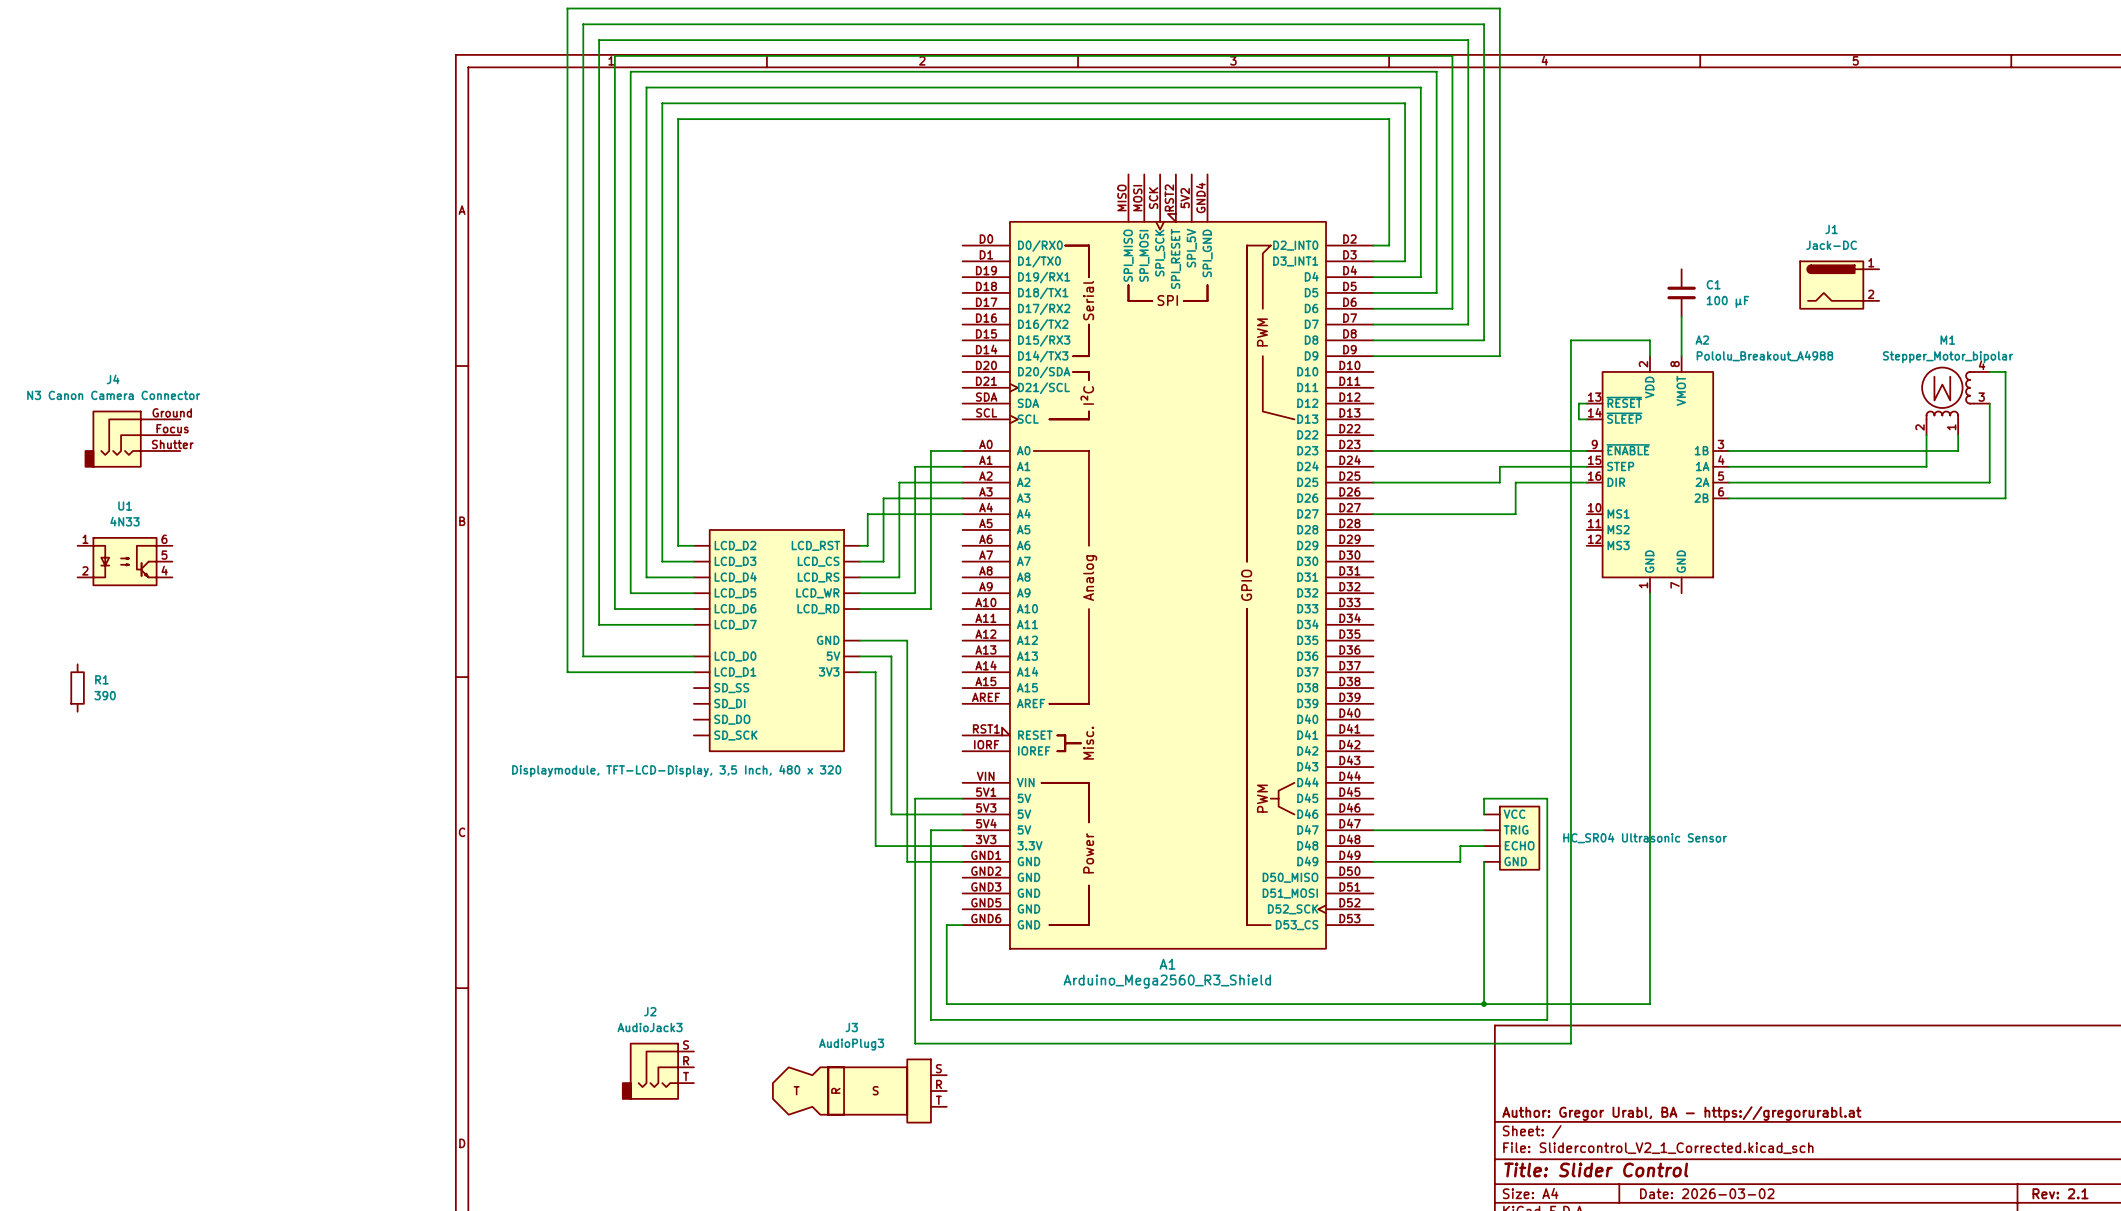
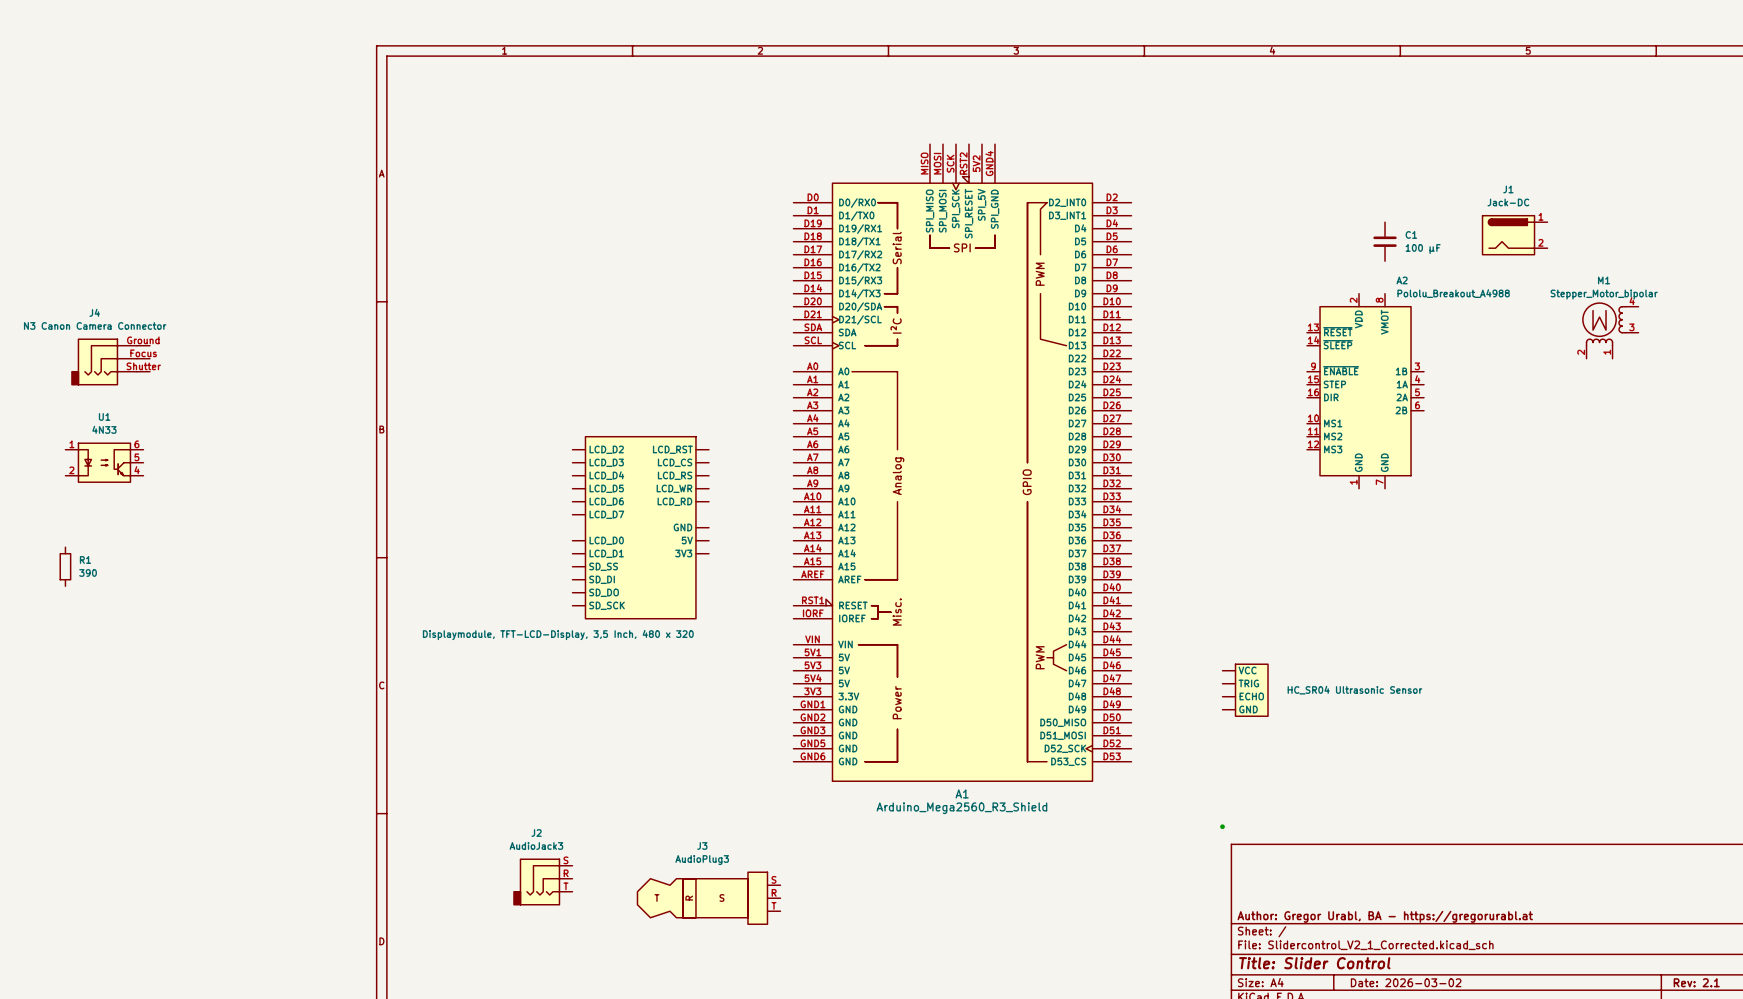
wire: (1373, 245) (1389, 245) (1389, 119) (678, 119) (678, 545) (693, 545) -> none
wire: (1373, 261) (1405, 261) (1405, 103) (662, 103) (662, 561) (693, 561) -> none
wire: (1373, 277) (1420, 277) (1420, 87) (646, 87) (646, 577) (693, 577) -> none
wire: (1373, 292) (1436, 292) (1436, 71) (630, 71) (630, 593) (693, 593) -> none
wire: (1373, 308) (1452, 308) (1452, 55) (614, 55) (614, 609) (693, 609) -> none
wire: (1681, 316) (1681, 356) -> none
wire: (1373, 324) (1468, 324) (1468, 40) (599, 40) (599, 624) (693, 624) -> none
wire: (1373, 340) (1484, 340) (1484, 24) (583, 24) (583, 656) (693, 656) -> none
wire: (1373, 356) (1499, 356) (1499, 8) (567, 8) (567, 672) (693, 672) -> none
wire: (1649, 356) (1649, 340) (1570, 340) (1570, 1043) (915, 1043) (915, 798) (962, 798) -> none
wire: (1989, 371) (2005, 371) (2005, 498) (1729, 498) -> none
wire: (1586, 403) (1578, 403) (1578, 419) (1586, 419) -> none
wire: (1989, 403) (1989, 482) (1729, 482) -> none
wire: (1926, 435) (1926, 466) (1729, 466) -> none
wire: (1958, 435) (1958, 450) (1729, 450) -> none
wire: (962, 450) (930, 450) (930, 609) (859, 609) -> none
wire: (1373, 450) (1586, 450) -> none
wire: (962, 466) (915, 466) (915, 593) (859, 593) -> none
wire: (1586, 466) (1499, 466) (1499, 482) (1373, 482) -> none
wire: (962, 482) (899, 482) (899, 577) (859, 577) -> none
wire: (1586, 482) (1515, 482) (1515, 514) (1373, 514) -> none
wire: (962, 498) (883, 498) (883, 561) (859, 561) -> none
wire: (962, 514) (867, 514) (867, 545) (859, 545) -> none
wire: (1649, 593) (1649, 1004) (946, 1004) (946, 925) (962, 925) -> none
wire: (859, 640) (907, 640) (907, 861) (962, 861) -> none
wire: (859, 656) (891, 656) (891, 814) (962, 814) -> none
wire: (859, 672) (875, 672) (875, 846) (962, 846) -> none
wire: (1484, 814) (1484, 798) (1547, 798) (1547, 1019) (930, 1019) (930, 830) (962, 830) -> none
wire: (1373, 830) (1484, 830) -> none
wire: (1484, 846) (1460, 846) (1460, 861) (1373, 861) -> none
wire: (1484, 861) (1484, 1004) -> none

